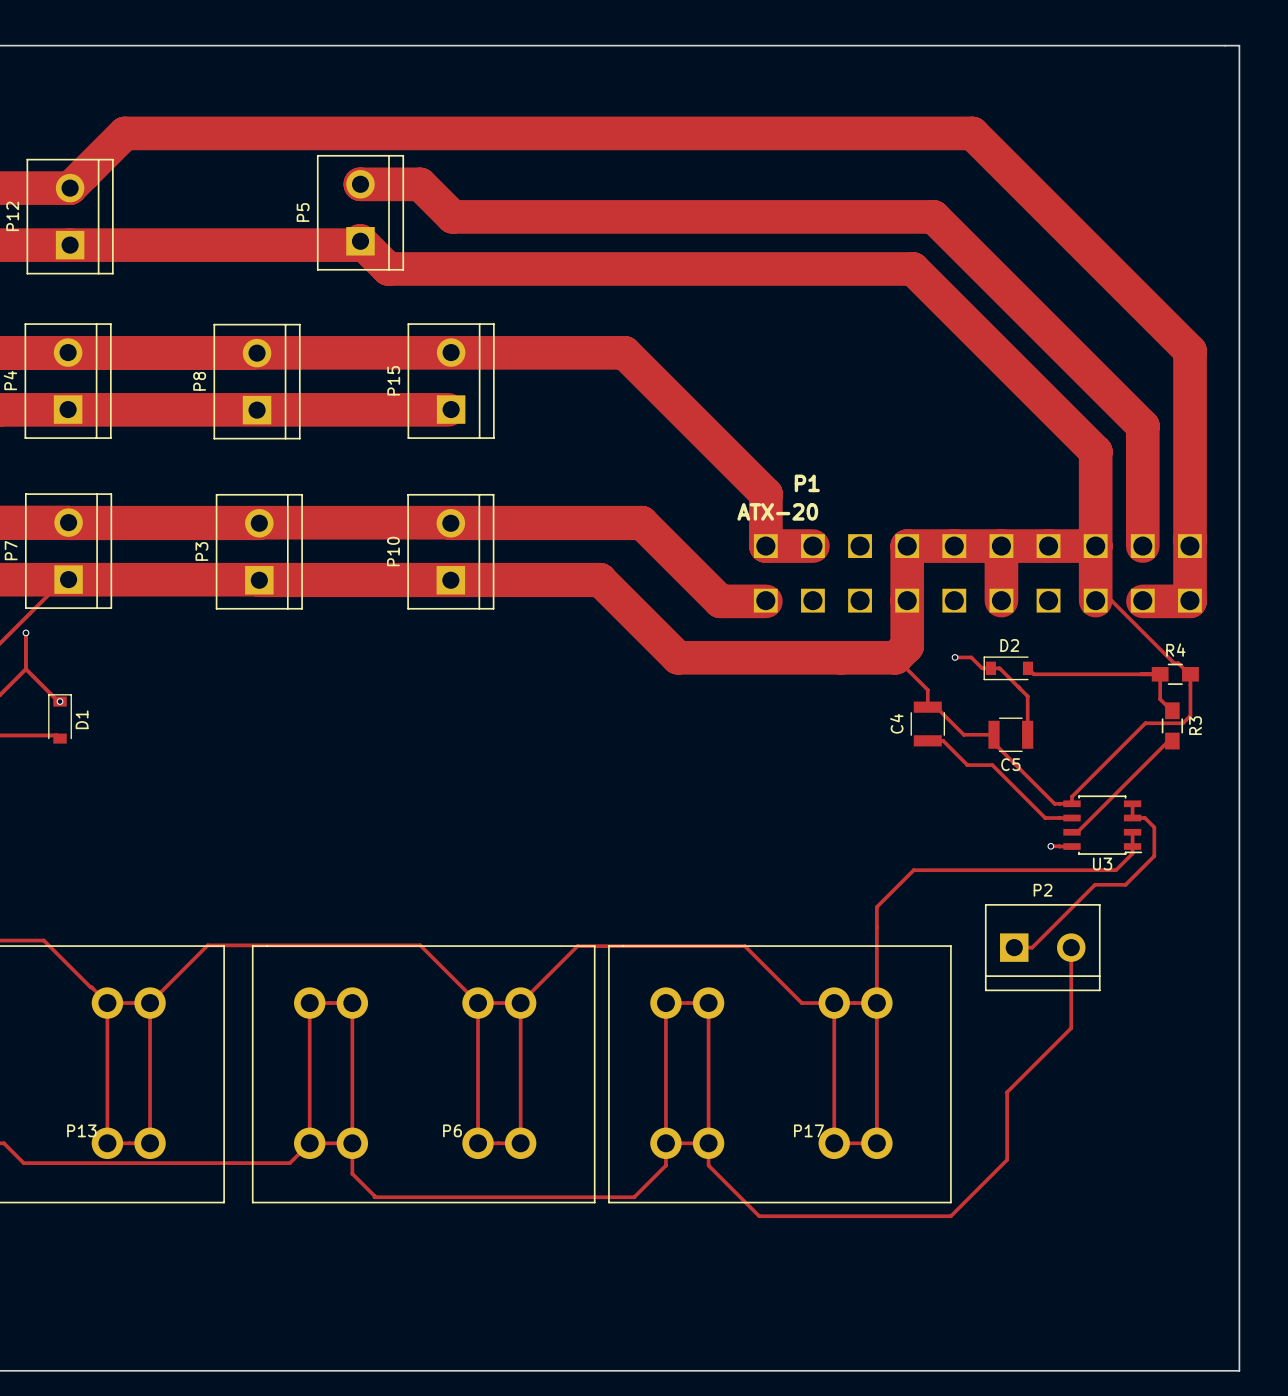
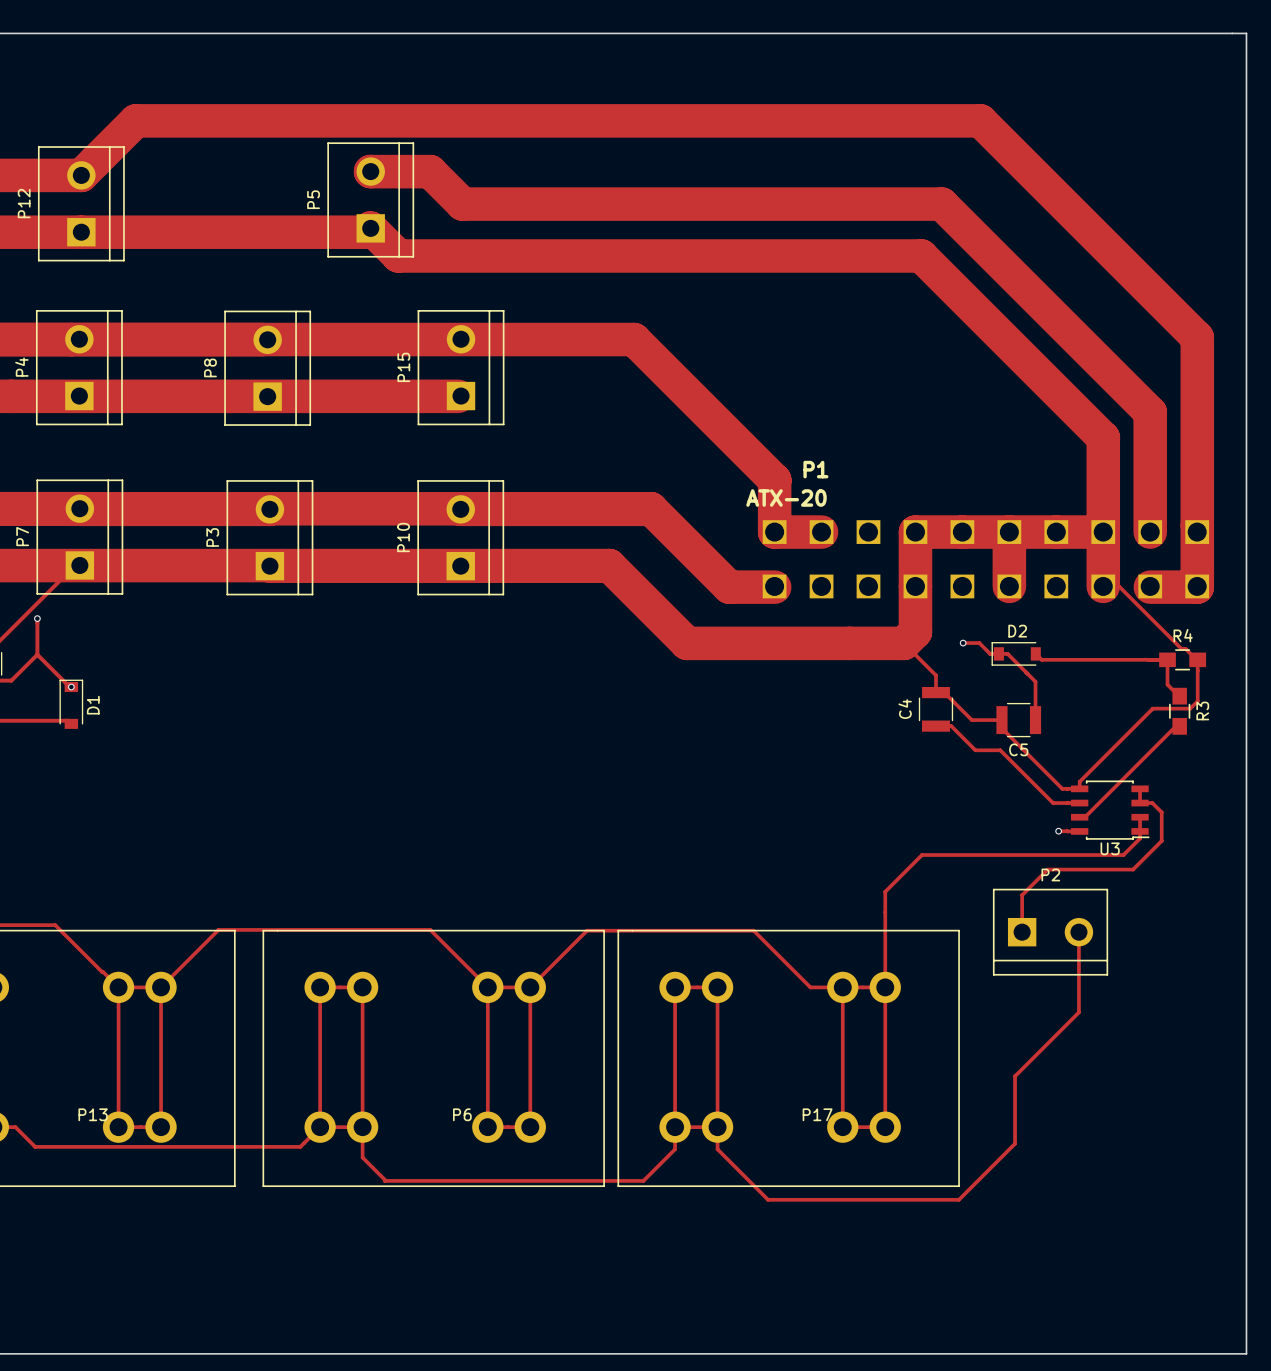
track: (1095, 884) (1032, 947) (1014, 947) -> (1102, 869) (1047, 869) (1022, 895) (1022, 932)

